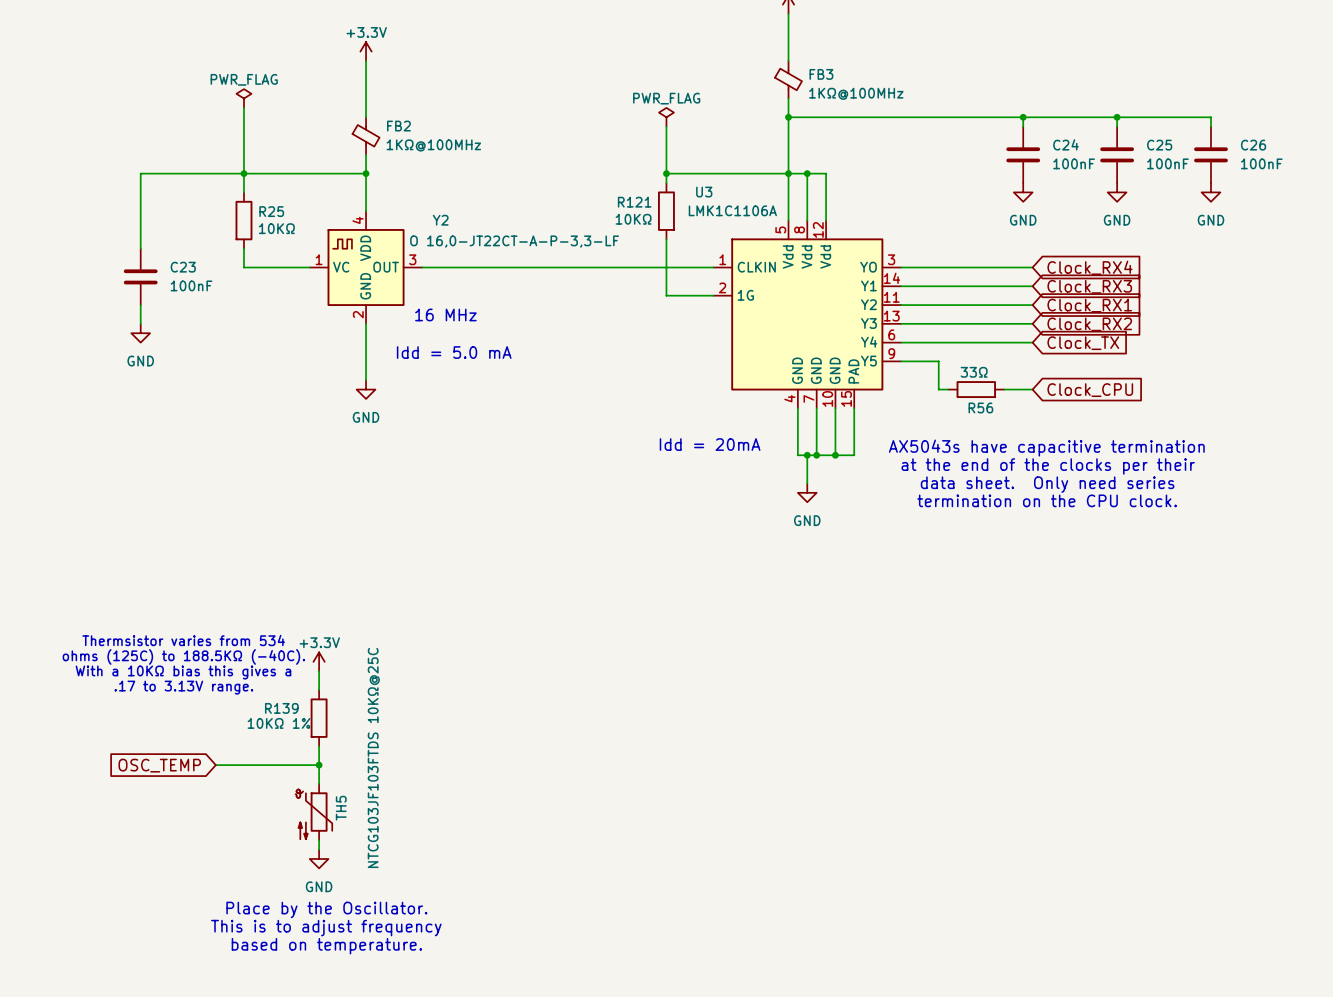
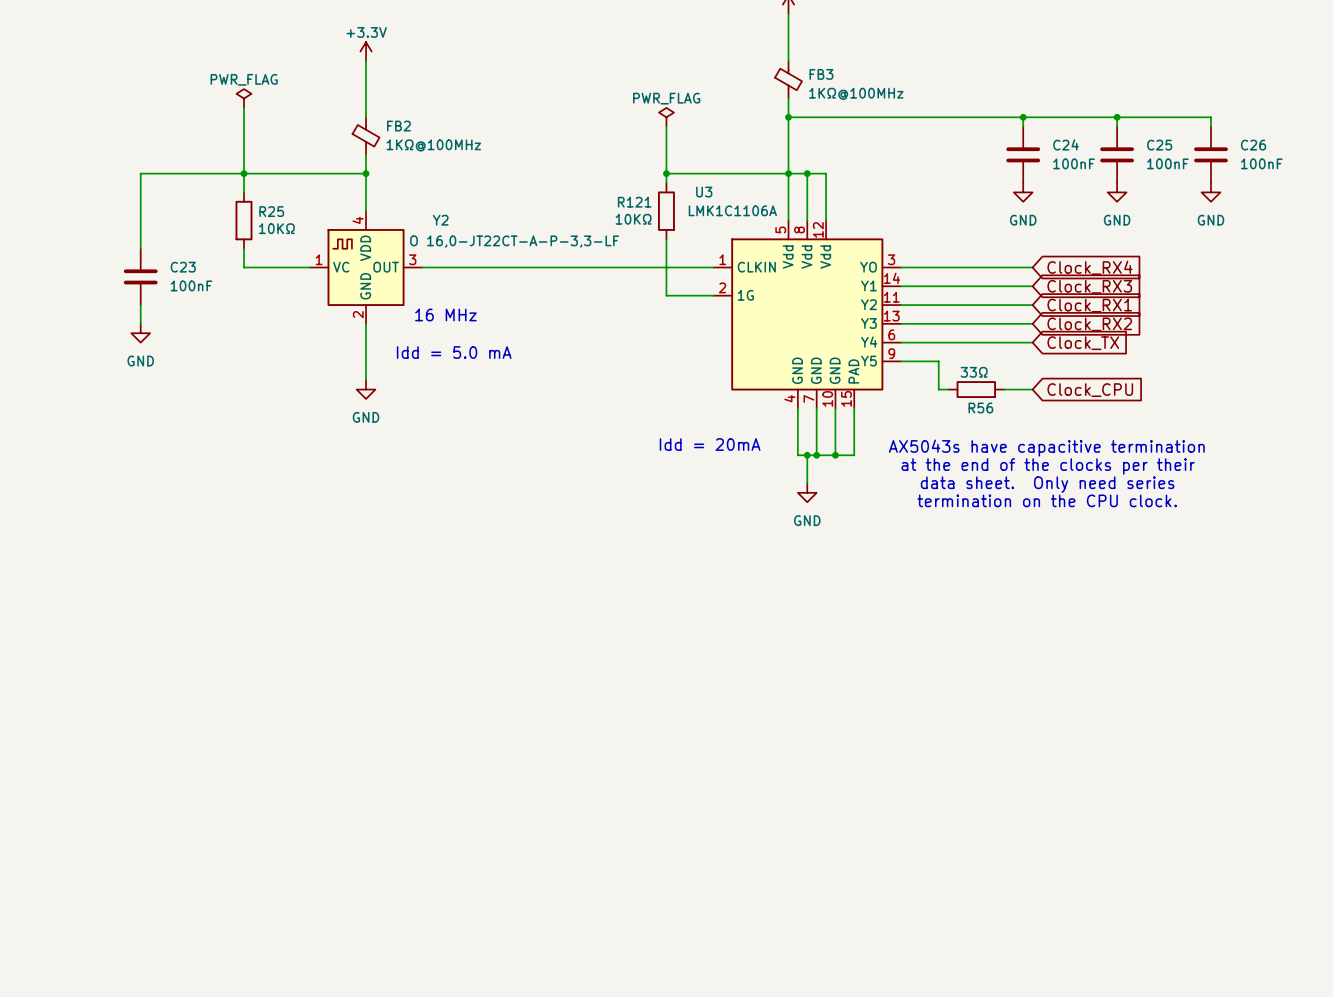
text: Thermsistor varies from 534 (183, 640) -> none
text: ohms (125C) to 188.5KΩ (-40C). (183, 656) -> none
power symbol: +3.3V (319, 661) -> none
wire: (319, 671) (319, 689) -> none
text: With a 10KΩ bias this gives a (183, 672) -> none
text: .17 to 3.13V range. (183, 687) -> none
R139: 10KΩ 1% (319, 718) -> none
wire: (319, 746) (319, 783) -> none
global label: OSC_TEMP (159, 765) -> none
wire: (215, 765) (319, 765) -> none
junction: (319, 765) -> none
TH5: NTCG103JF103FTDS 10KΩ@25C (313, 812) -> none
wire: (319, 840) (319, 849) -> none
power symbol: GND (319, 858) -> none
text: Place by the Oscillator. (326, 909) -> none
text: This is to adjust frequency (326, 928) -> none
text: based on temperature. (326, 946) -> none

